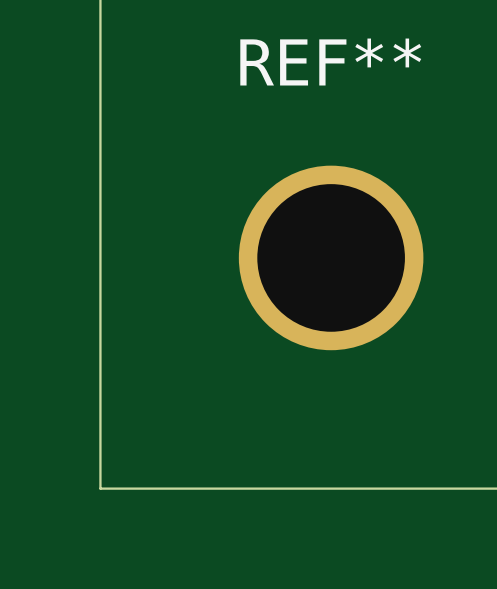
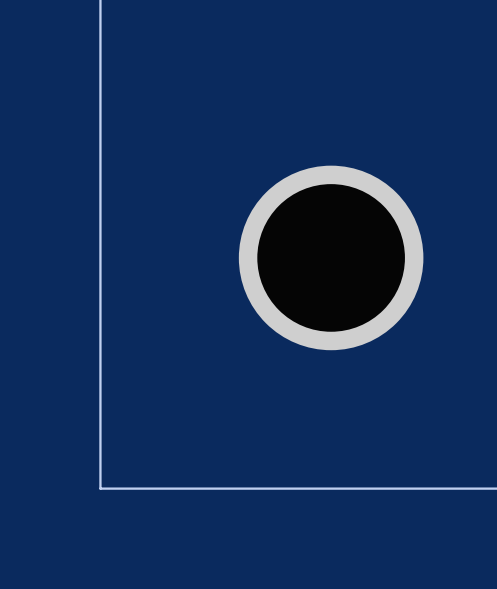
REF** name: REF** (330, 62) -> none

